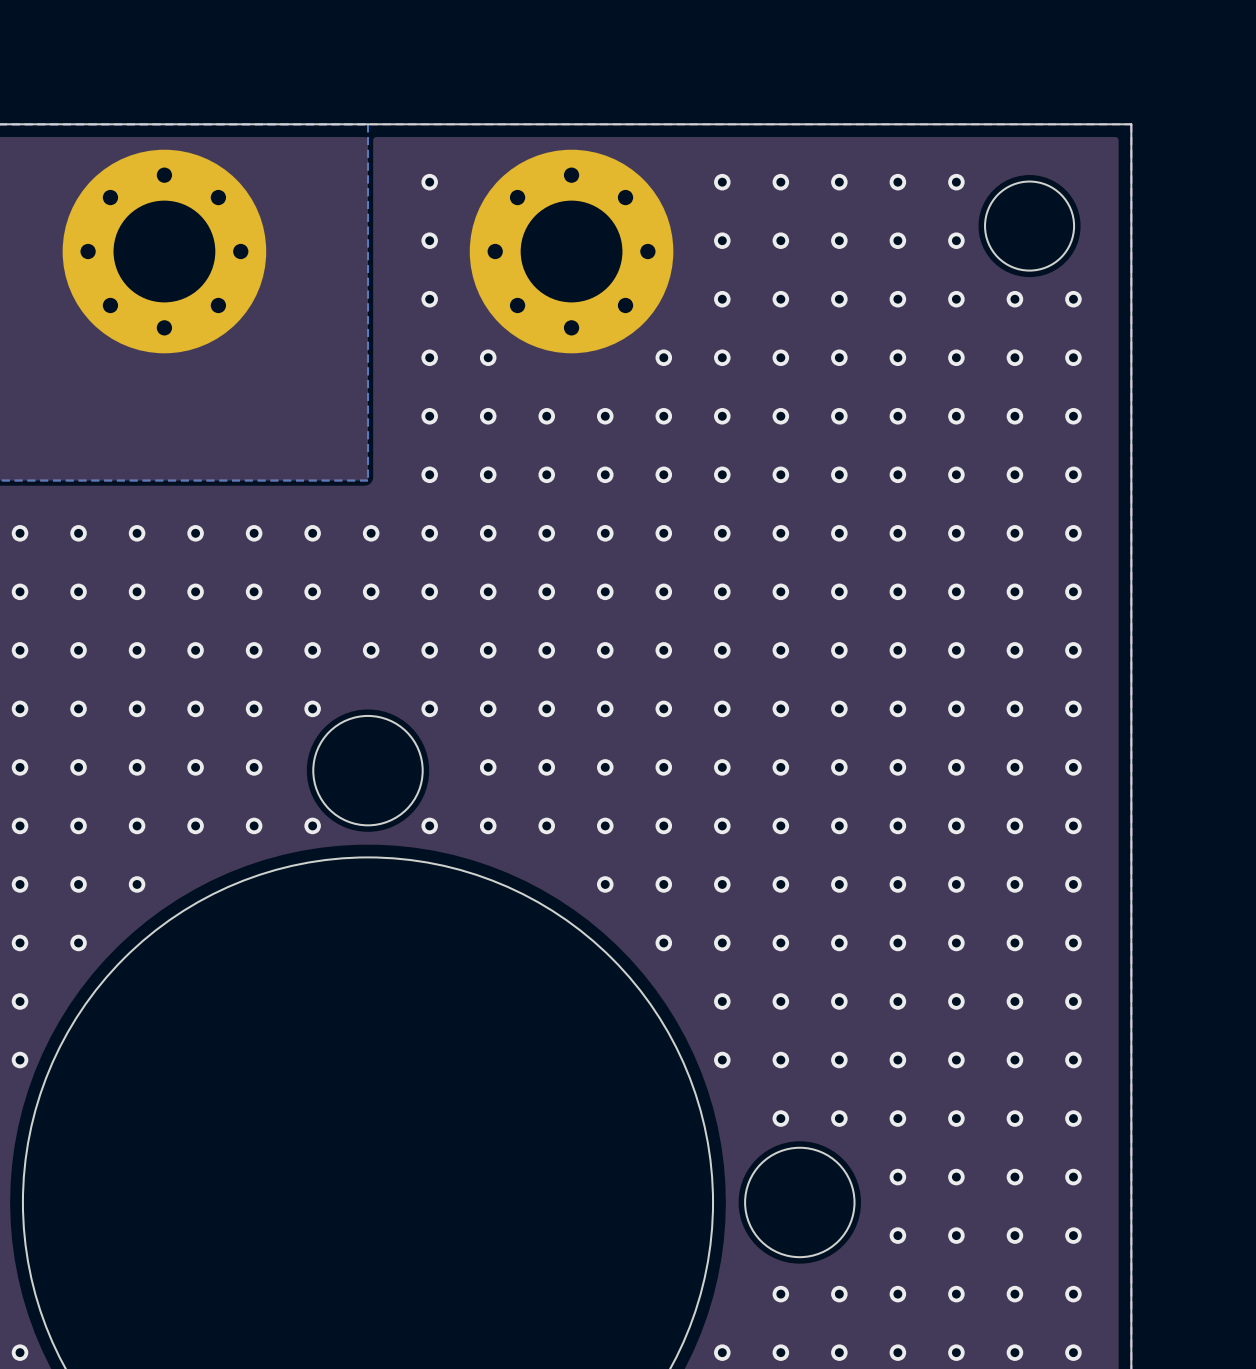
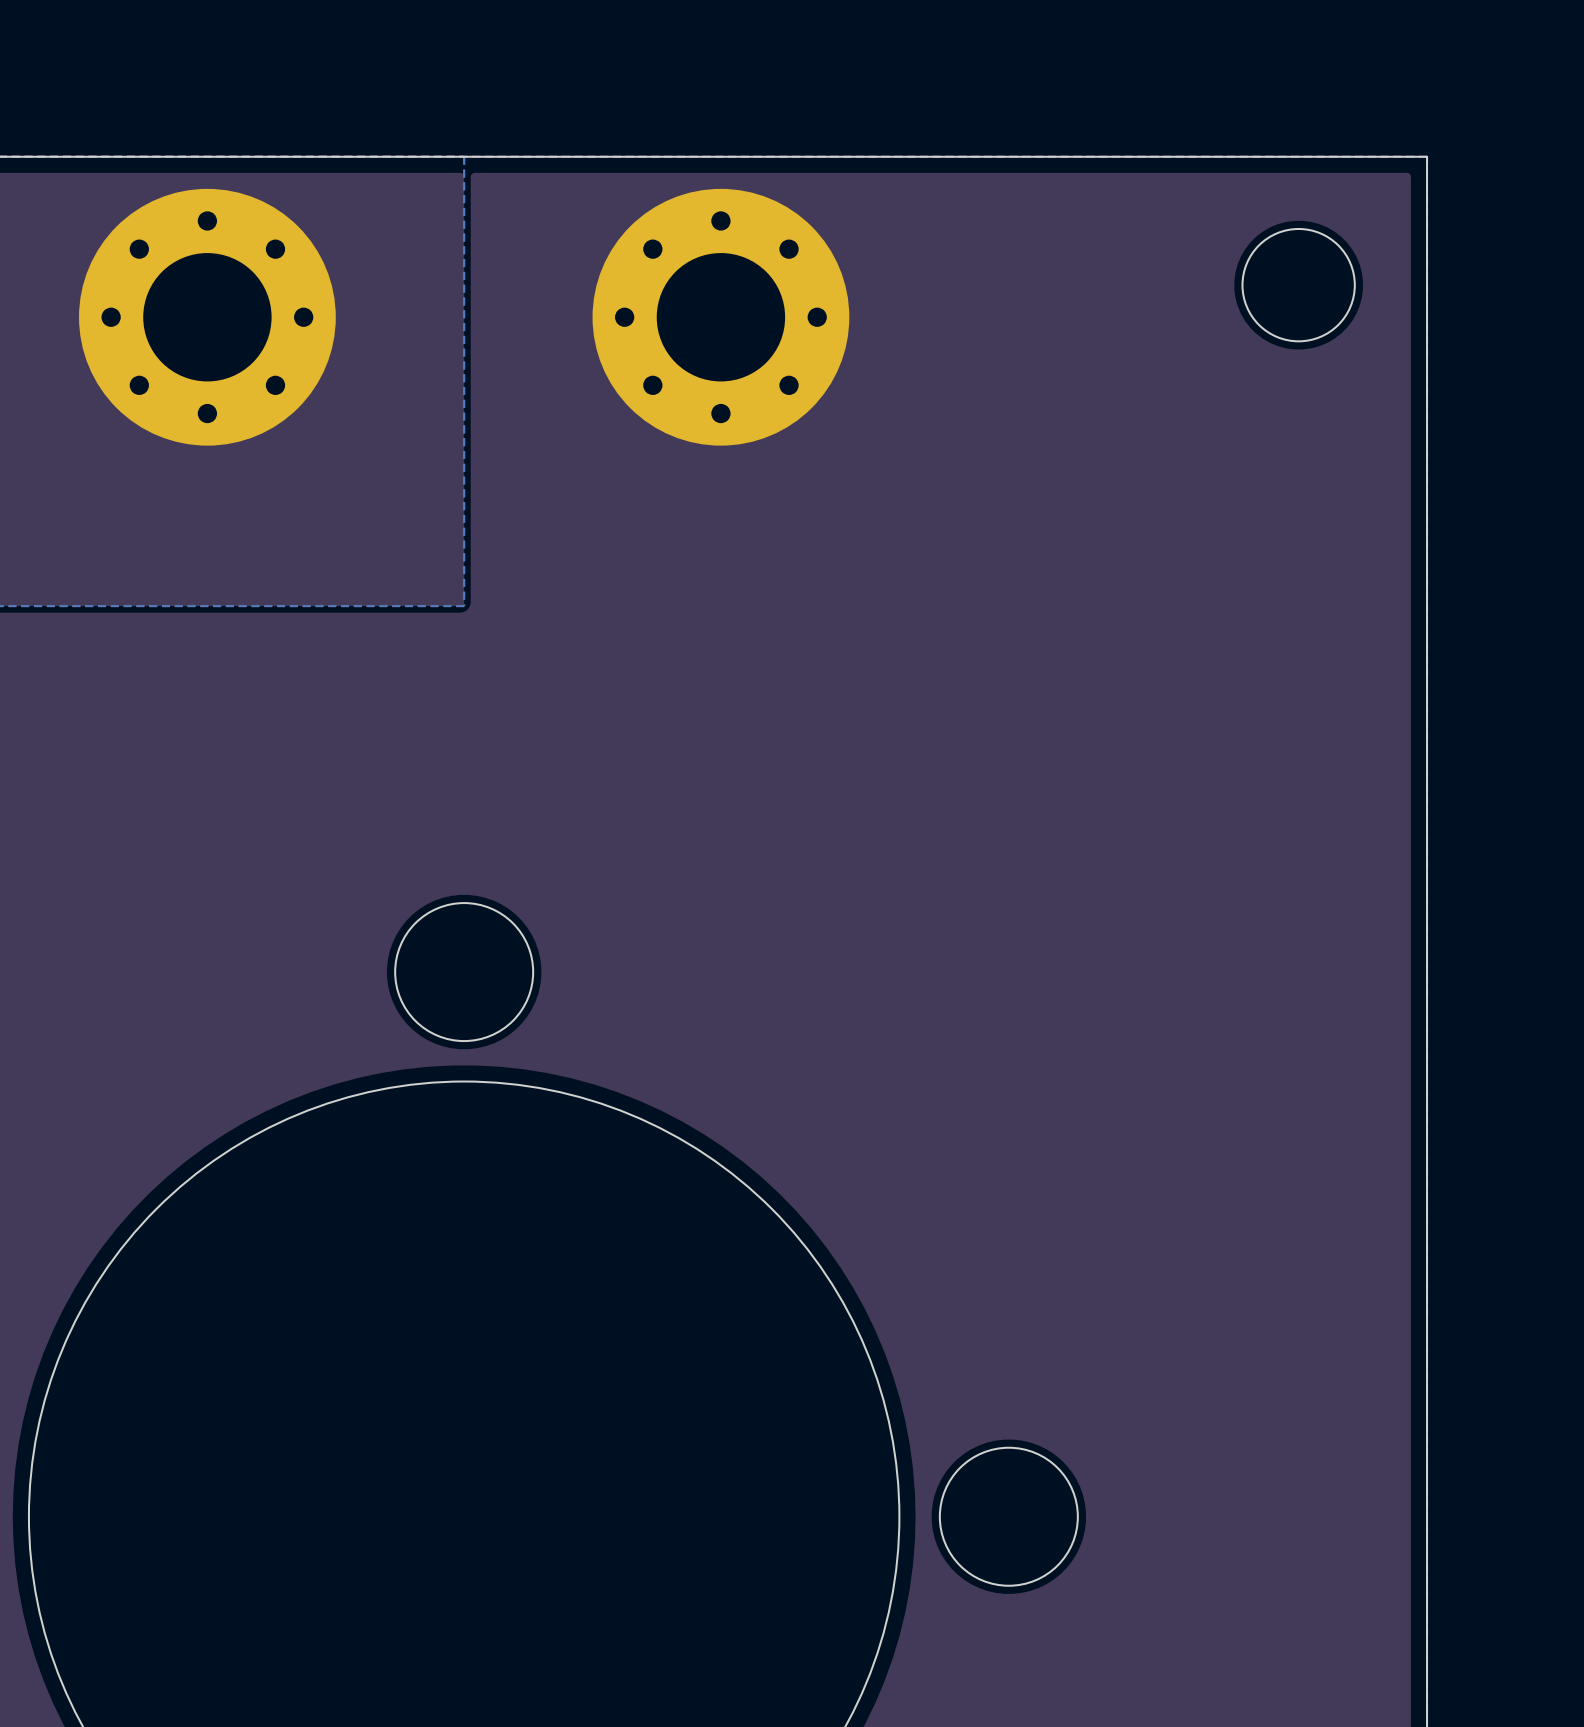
via: (429, 182) -> none
via: (722, 182) -> none
via: (780, 182) -> none
via: (839, 182) -> none
via: (897, 182) -> none
via: (956, 182) -> none
via: (429, 240) -> none
via: (722, 240) -> none
via: (780, 240) -> none
via: (839, 240) -> none
via: (897, 240) -> none
via: (956, 240) -> none
via: (429, 299) -> none
via: (722, 299) -> none
via: (780, 299) -> none
via: (839, 299) -> none
via: (897, 299) -> none
via: (956, 299) -> none
via: (1014, 299) -> none
via: (1073, 299) -> none
via: (429, 357) -> none
via: (488, 357) -> none
via: (663, 357) -> none
via: (722, 357) -> none
via: (780, 357) -> none
via: (839, 357) -> none
via: (897, 357) -> none
via: (956, 357) -> none
via: (1014, 357) -> none
via: (1073, 357) -> none
via: (429, 416) -> none
via: (488, 416) -> none
via: (546, 416) -> none
via: (605, 416) -> none
via: (663, 416) -> none
via: (722, 416) -> none
via: (780, 416) -> none
via: (839, 416) -> none
via: (897, 416) -> none
via: (956, 416) -> none
via: (1014, 416) -> none
via: (1073, 416) -> none
via: (429, 474) -> none
via: (488, 474) -> none
via: (546, 474) -> none
via: (605, 474) -> none
via: (663, 474) -> none
via: (722, 474) -> none
via: (780, 474) -> none
via: (839, 474) -> none
via: (897, 474) -> none
via: (956, 474) -> none
via: (1014, 474) -> none
via: (1073, 474) -> none
via: (20, 533) -> none
via: (78, 533) -> none
via: (137, 533) -> none
via: (195, 533) -> none
via: (254, 533) -> none
via: (312, 533) -> none
via: (371, 533) -> none
via: (429, 533) -> none
via: (488, 533) -> none
via: (546, 533) -> none
via: (605, 533) -> none
via: (663, 533) -> none
via: (722, 533) -> none
via: (780, 533) -> none
via: (839, 533) -> none
via: (897, 533) -> none
via: (956, 533) -> none
via: (1014, 533) -> none
via: (1073, 533) -> none
via: (20, 591) -> none
via: (78, 591) -> none
via: (137, 591) -> none
via: (195, 591) -> none
via: (254, 591) -> none
via: (312, 591) -> none
via: (371, 591) -> none
via: (429, 591) -> none
via: (488, 591) -> none
via: (546, 591) -> none
via: (605, 591) -> none
via: (663, 591) -> none
via: (722, 591) -> none
via: (780, 591) -> none
via: (839, 591) -> none
via: (897, 591) -> none
via: (956, 591) -> none
via: (1014, 591) -> none
via: (1073, 591) -> none
via: (20, 650) -> none
via: (78, 650) -> none
via: (137, 650) -> none
via: (195, 650) -> none
via: (254, 650) -> none
via: (312, 650) -> none
via: (371, 650) -> none
via: (429, 650) -> none
via: (488, 650) -> none
via: (546, 650) -> none
via: (605, 650) -> none
via: (663, 650) -> none
via: (722, 650) -> none
via: (780, 650) -> none
via: (839, 650) -> none
via: (897, 650) -> none
via: (956, 650) -> none
via: (1014, 650) -> none
via: (1073, 650) -> none
via: (20, 708) -> none
via: (78, 708) -> none
via: (137, 708) -> none
via: (195, 708) -> none
via: (254, 708) -> none
via: (312, 708) -> none
via: (429, 708) -> none
via: (488, 708) -> none
via: (546, 708) -> none
via: (605, 708) -> none
via: (663, 708) -> none
via: (722, 708) -> none
via: (780, 708) -> none
via: (839, 708) -> none
via: (897, 708) -> none
via: (956, 708) -> none
via: (1014, 708) -> none
via: (1073, 708) -> none
via: (20, 767) -> none
via: (78, 767) -> none
via: (137, 767) -> none
via: (195, 767) -> none
via: (254, 767) -> none
via: (488, 767) -> none
via: (546, 767) -> none
via: (605, 767) -> none
via: (663, 767) -> none
via: (722, 767) -> none
via: (780, 767) -> none
via: (839, 767) -> none
via: (897, 767) -> none
via: (956, 767) -> none
via: (1014, 767) -> none
via: (1073, 767) -> none
via: (20, 825) -> none
via: (78, 825) -> none
via: (137, 825) -> none
via: (195, 825) -> none
via: (254, 825) -> none
via: (312, 825) -> none
via: (429, 825) -> none
via: (488, 825) -> none
via: (546, 825) -> none
via: (605, 825) -> none
via: (663, 825) -> none
via: (722, 825) -> none
via: (780, 825) -> none
via: (839, 825) -> none
via: (897, 825) -> none
via: (956, 825) -> none
via: (1014, 825) -> none
via: (1073, 825) -> none
via: (20, 884) -> none
via: (78, 884) -> none
via: (137, 884) -> none
via: (605, 884) -> none
via: (663, 884) -> none
via: (722, 884) -> none
via: (780, 884) -> none
via: (839, 884) -> none
via: (897, 884) -> none
via: (956, 884) -> none
via: (1014, 884) -> none
via: (1073, 884) -> none
via: (20, 942) -> none
via: (78, 942) -> none
via: (663, 942) -> none
via: (722, 942) -> none
via: (780, 942) -> none
via: (839, 942) -> none
via: (897, 942) -> none
via: (956, 942) -> none
via: (1014, 942) -> none
via: (1073, 942) -> none
via: (20, 1001) -> none
via: (722, 1001) -> none
via: (780, 1001) -> none
via: (839, 1001) -> none
via: (897, 1001) -> none
via: (956, 1001) -> none
via: (1014, 1001) -> none
via: (1073, 1001) -> none
via: (20, 1060) -> none
via: (722, 1060) -> none
via: (780, 1060) -> none
via: (839, 1060) -> none
via: (897, 1060) -> none
via: (956, 1060) -> none
via: (1014, 1060) -> none
via: (1073, 1060) -> none
via: (780, 1118) -> none
via: (839, 1118) -> none
via: (897, 1118) -> none
via: (956, 1118) -> none
via: (1014, 1118) -> none
via: (1073, 1118) -> none
via: (897, 1177) -> none
via: (956, 1177) -> none
via: (1014, 1177) -> none
via: (1073, 1177) -> none
via: (897, 1235) -> none
via: (956, 1235) -> none
via: (1014, 1235) -> none
via: (1073, 1235) -> none
via: (780, 1294) -> none
via: (839, 1294) -> none
via: (897, 1294) -> none
via: (956, 1294) -> none
via: (1014, 1294) -> none
via: (1073, 1294) -> none
via: (20, 1352) -> none
via: (722, 1352) -> none
via: (780, 1352) -> none
via: (839, 1352) -> none
via: (897, 1352) -> none
via: (956, 1352) -> none
via: (1014, 1352) -> none
via: (1073, 1352) -> none

